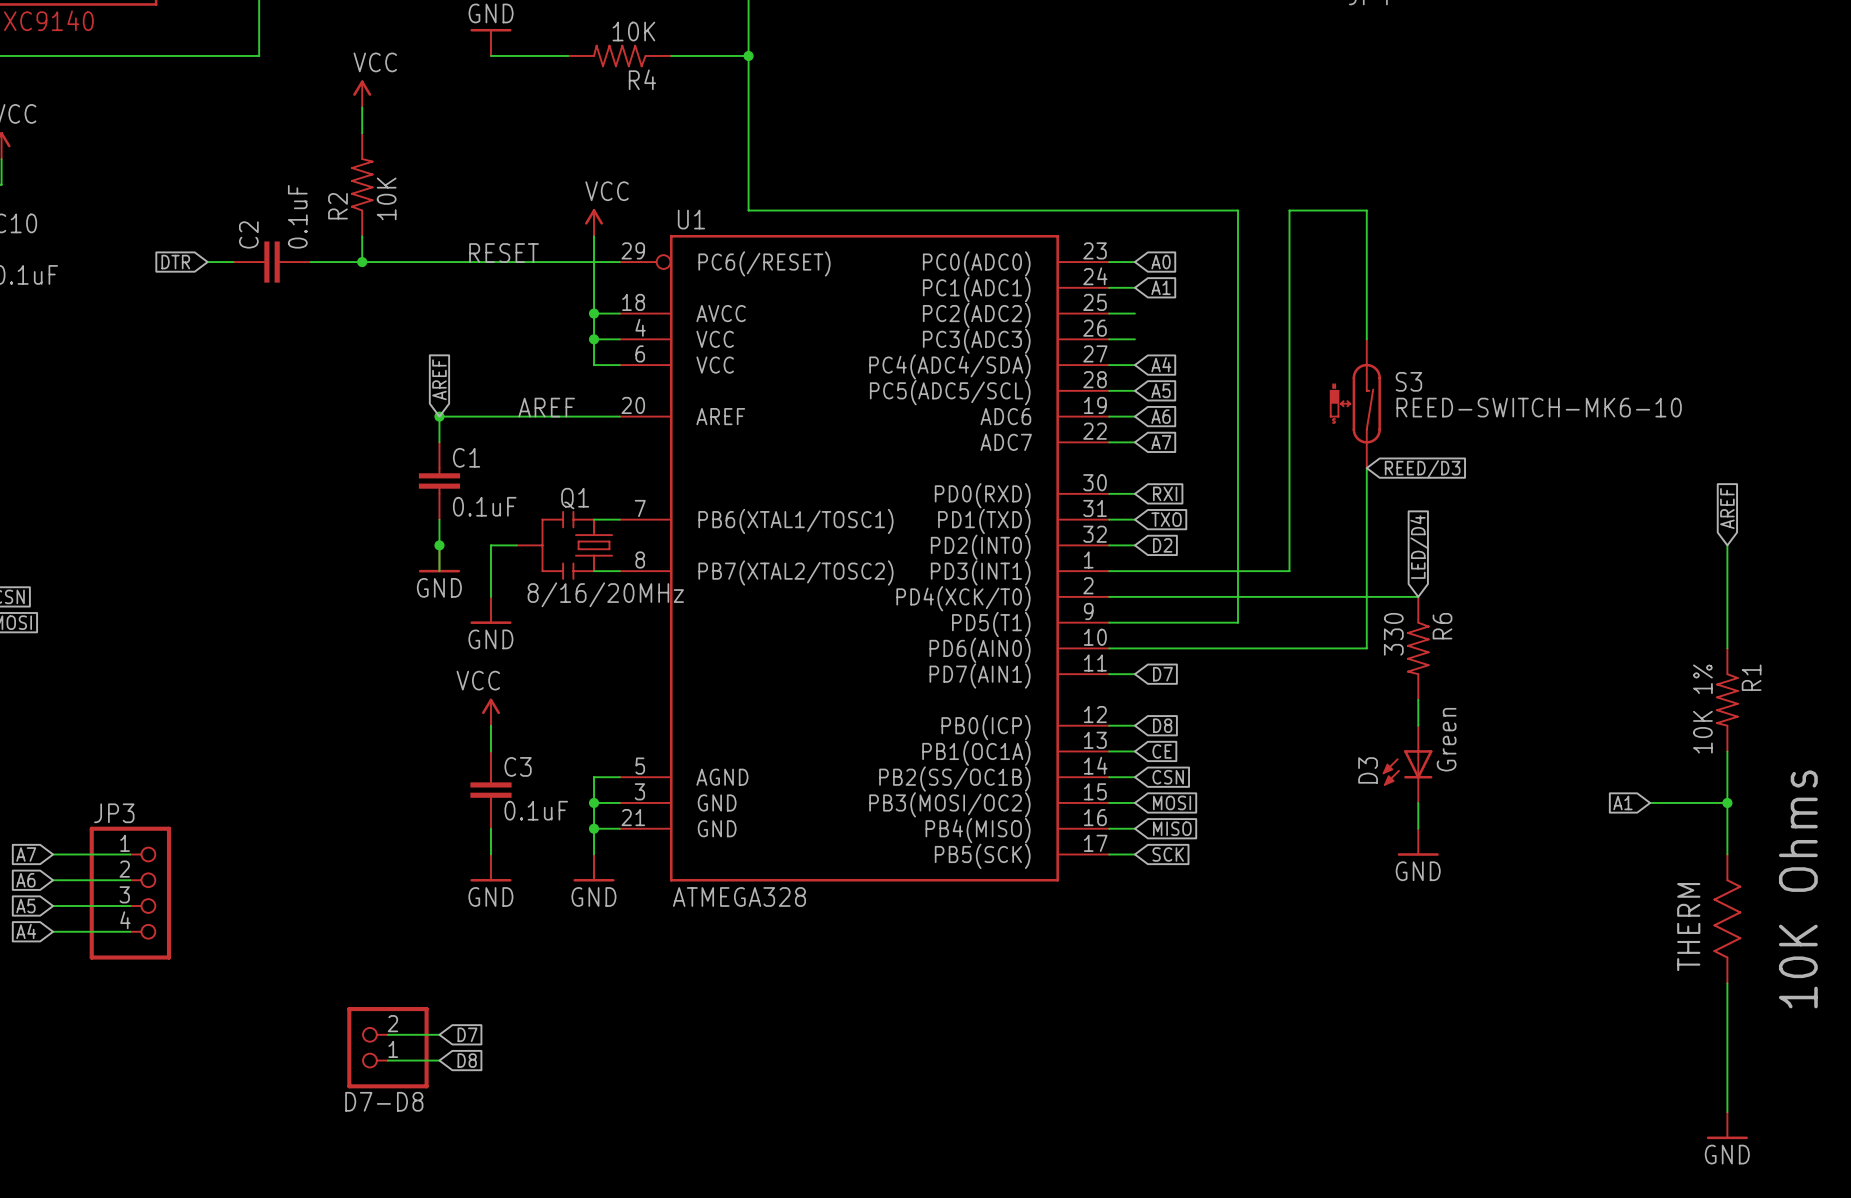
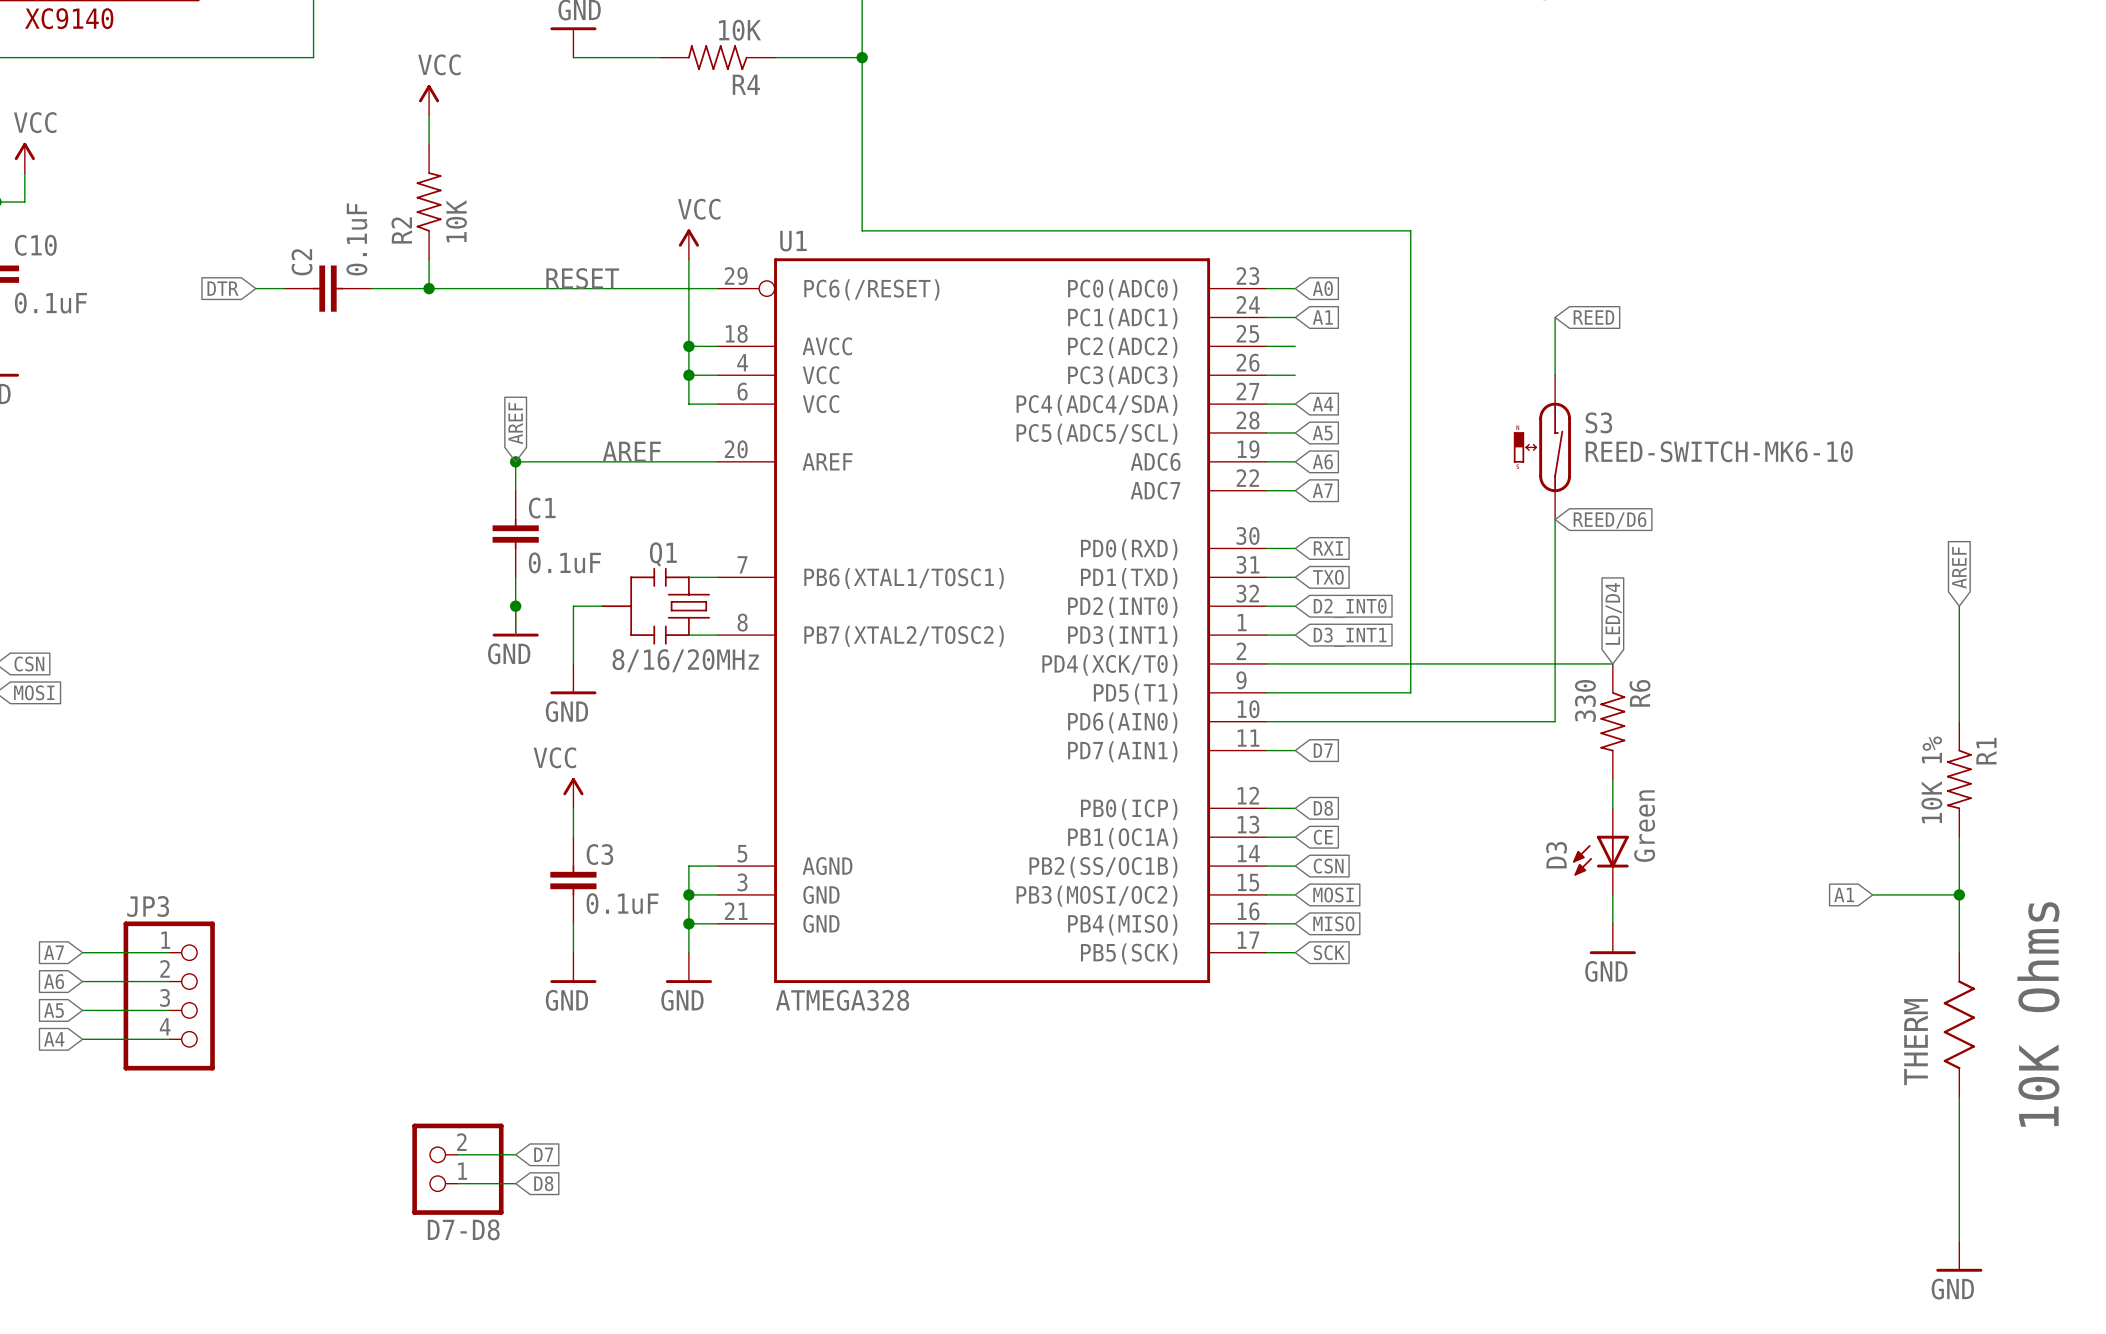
wire: (1366, 287) (1366, 210) (1289, 210) (1289, 571) (1134, 571) -> none
global label: none -> REED (1593, 317)
global label: REED/D3 (1422, 469) -> REED/D6 (1610, 520)
global label: D2 (1162, 545) -> D2_INT0 (1350, 608)
global label: none -> D3_INT1 (1350, 637)

